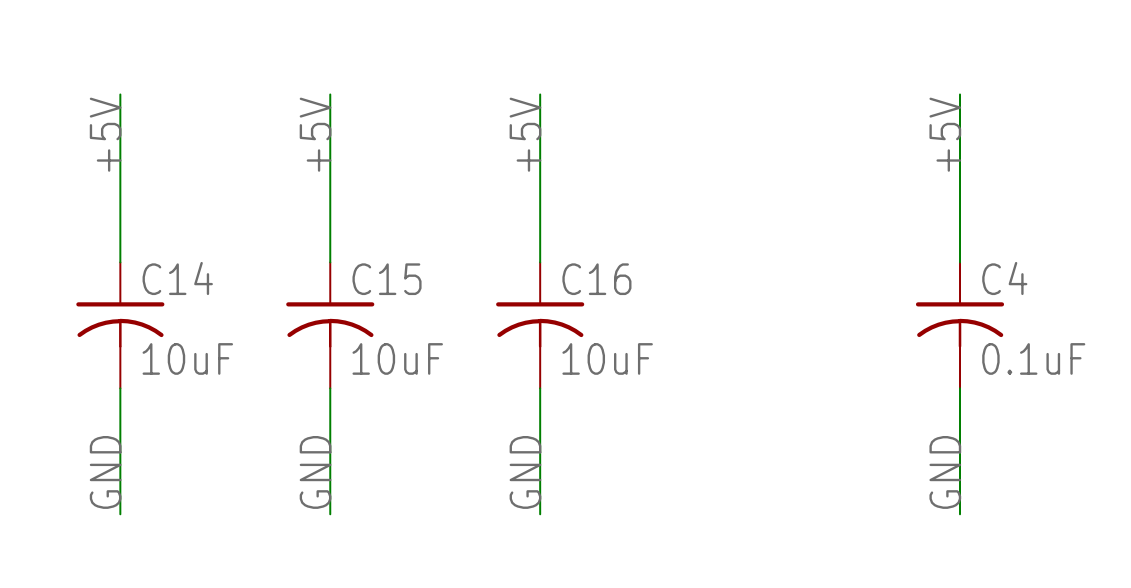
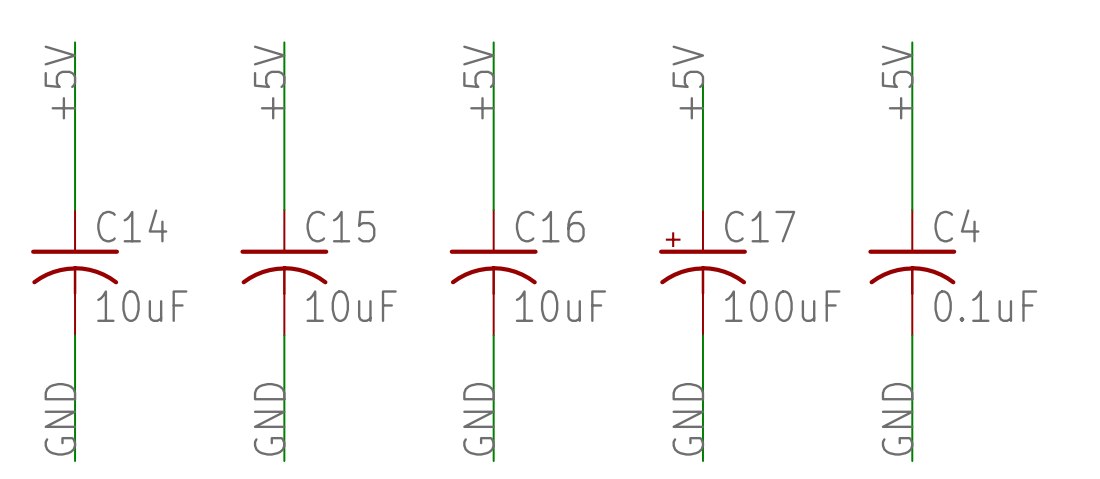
label: none -> +5V (688, 82)
wire: none -> (702, 84) (702, 209)
C17: none -> 100uF (702, 272)
wire: none -> (702, 335) (702, 461)
label: none -> GND (688, 419)

